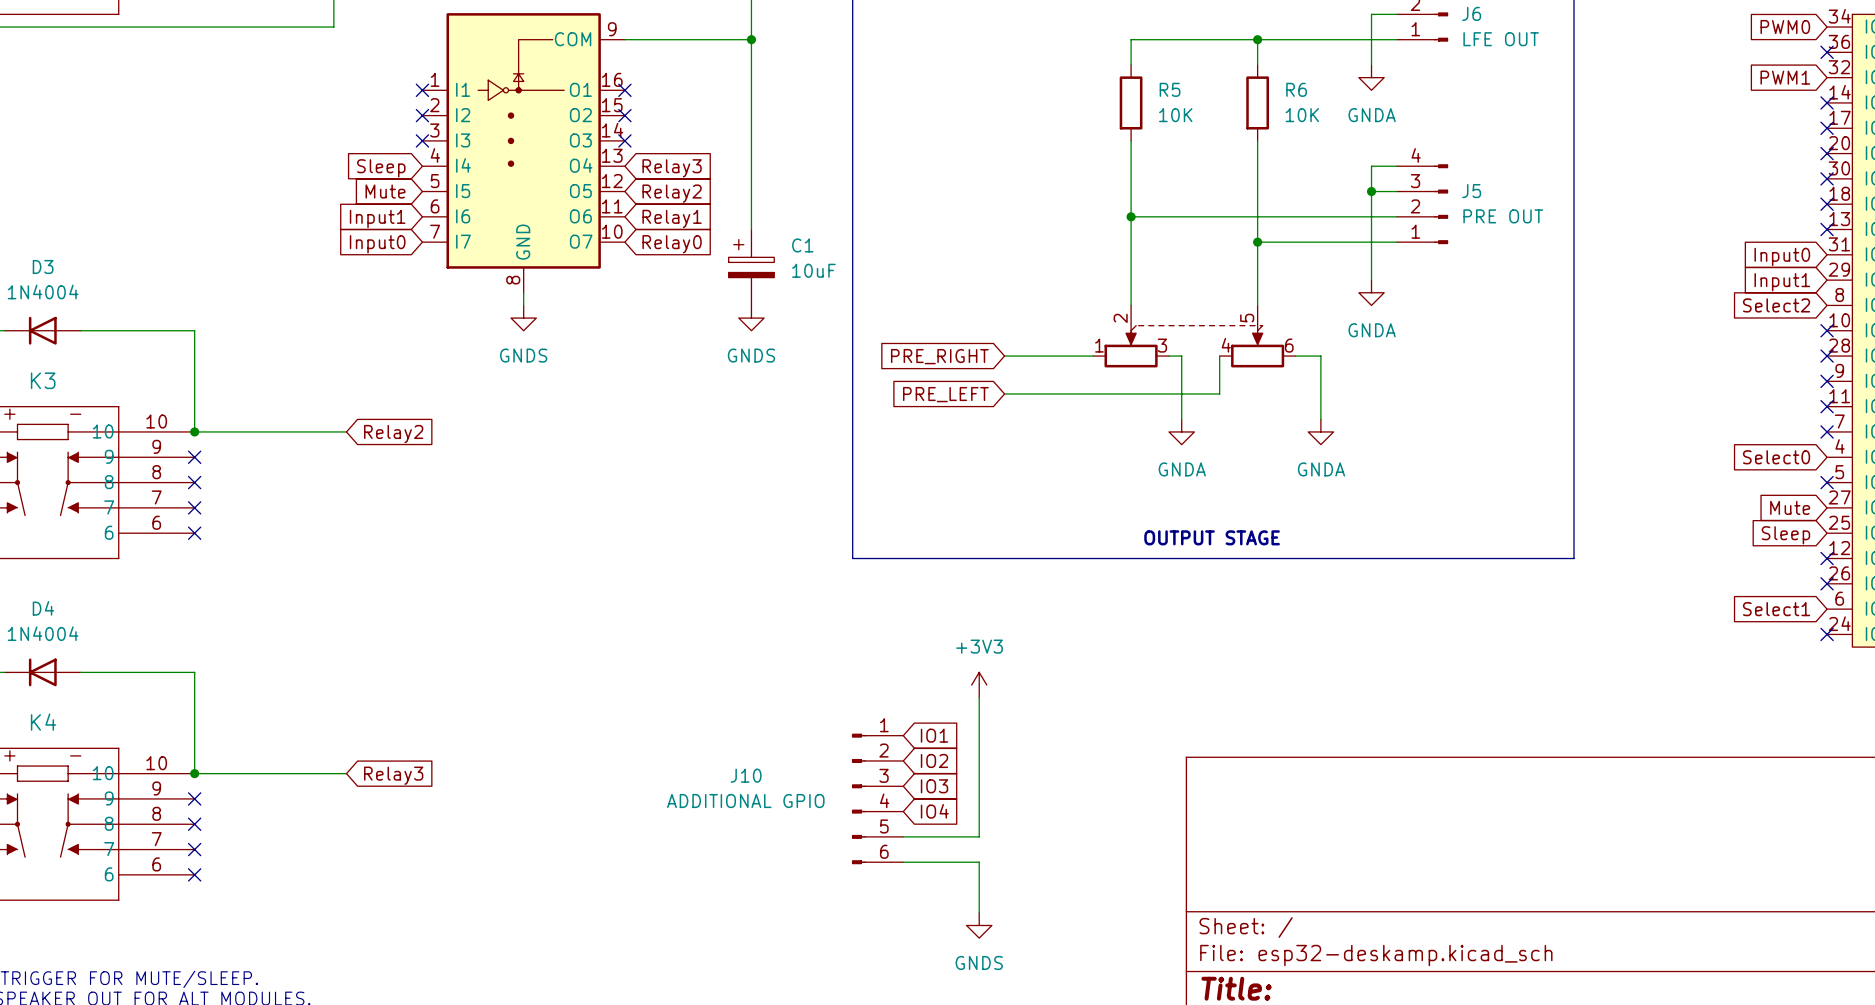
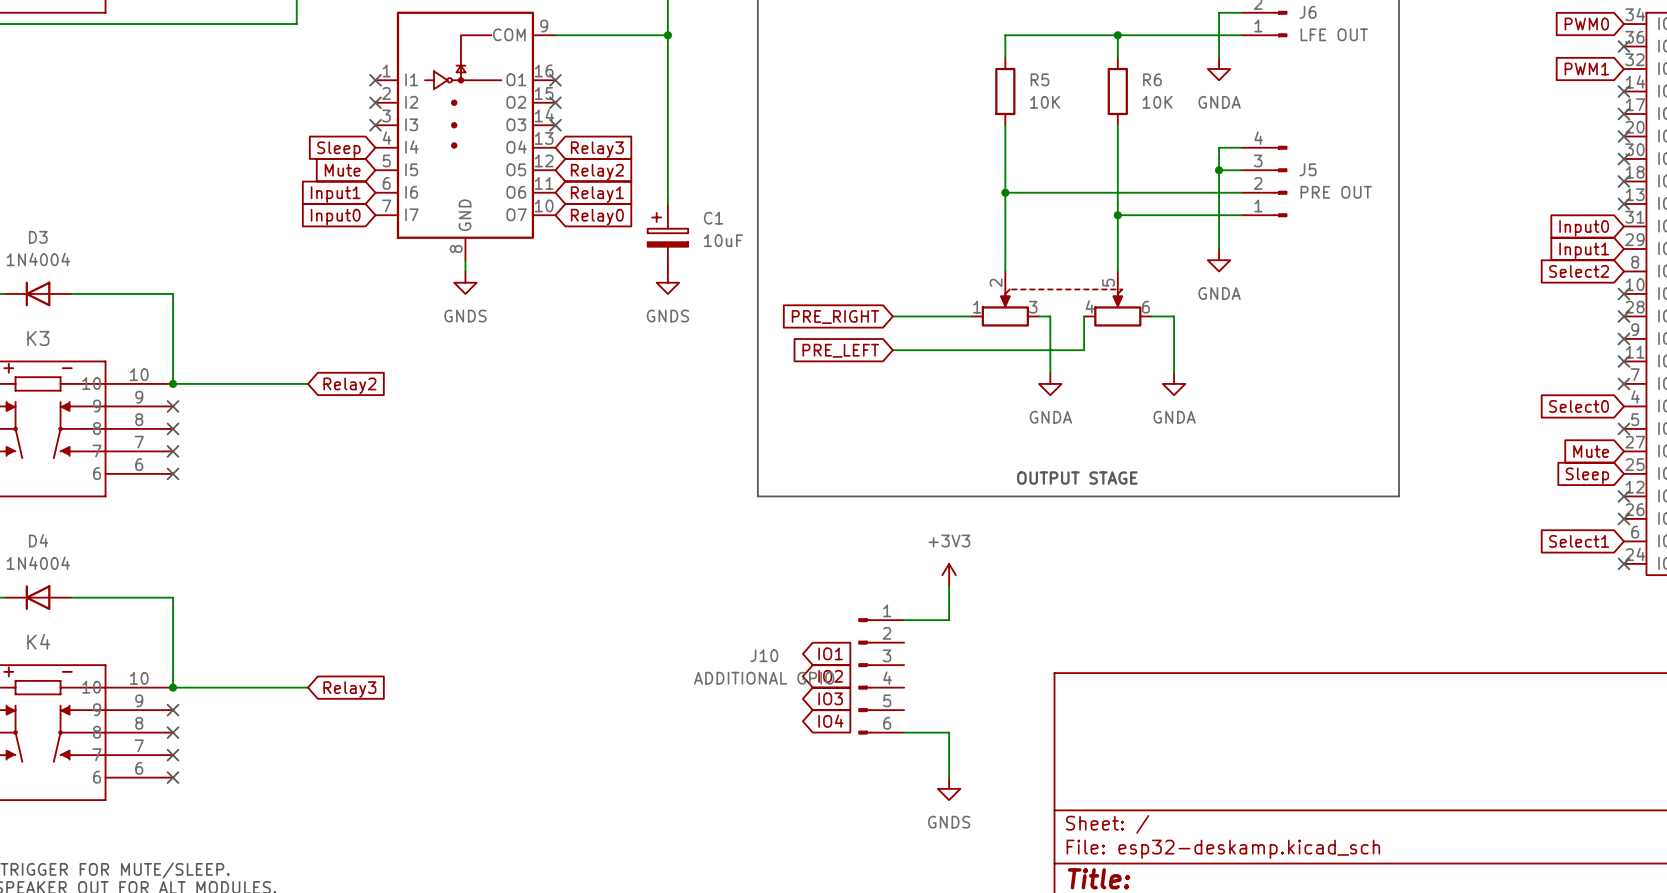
wire: none -> (949, 586) (949, 620) (904, 620)
power symbol position: +3V3 (979, 685) -> +3V3 (949, 575)
wire: (979, 697) (979, 836) (903, 836) -> none
J10 position: (877, 798) -> (881, 676)
wire: none -> (904, 732) (949, 732) (949, 777)
wire: (903, 862) (979, 862) (979, 912) -> none
power symbol position: GNDS (979, 925) -> GNDS (949, 788)

